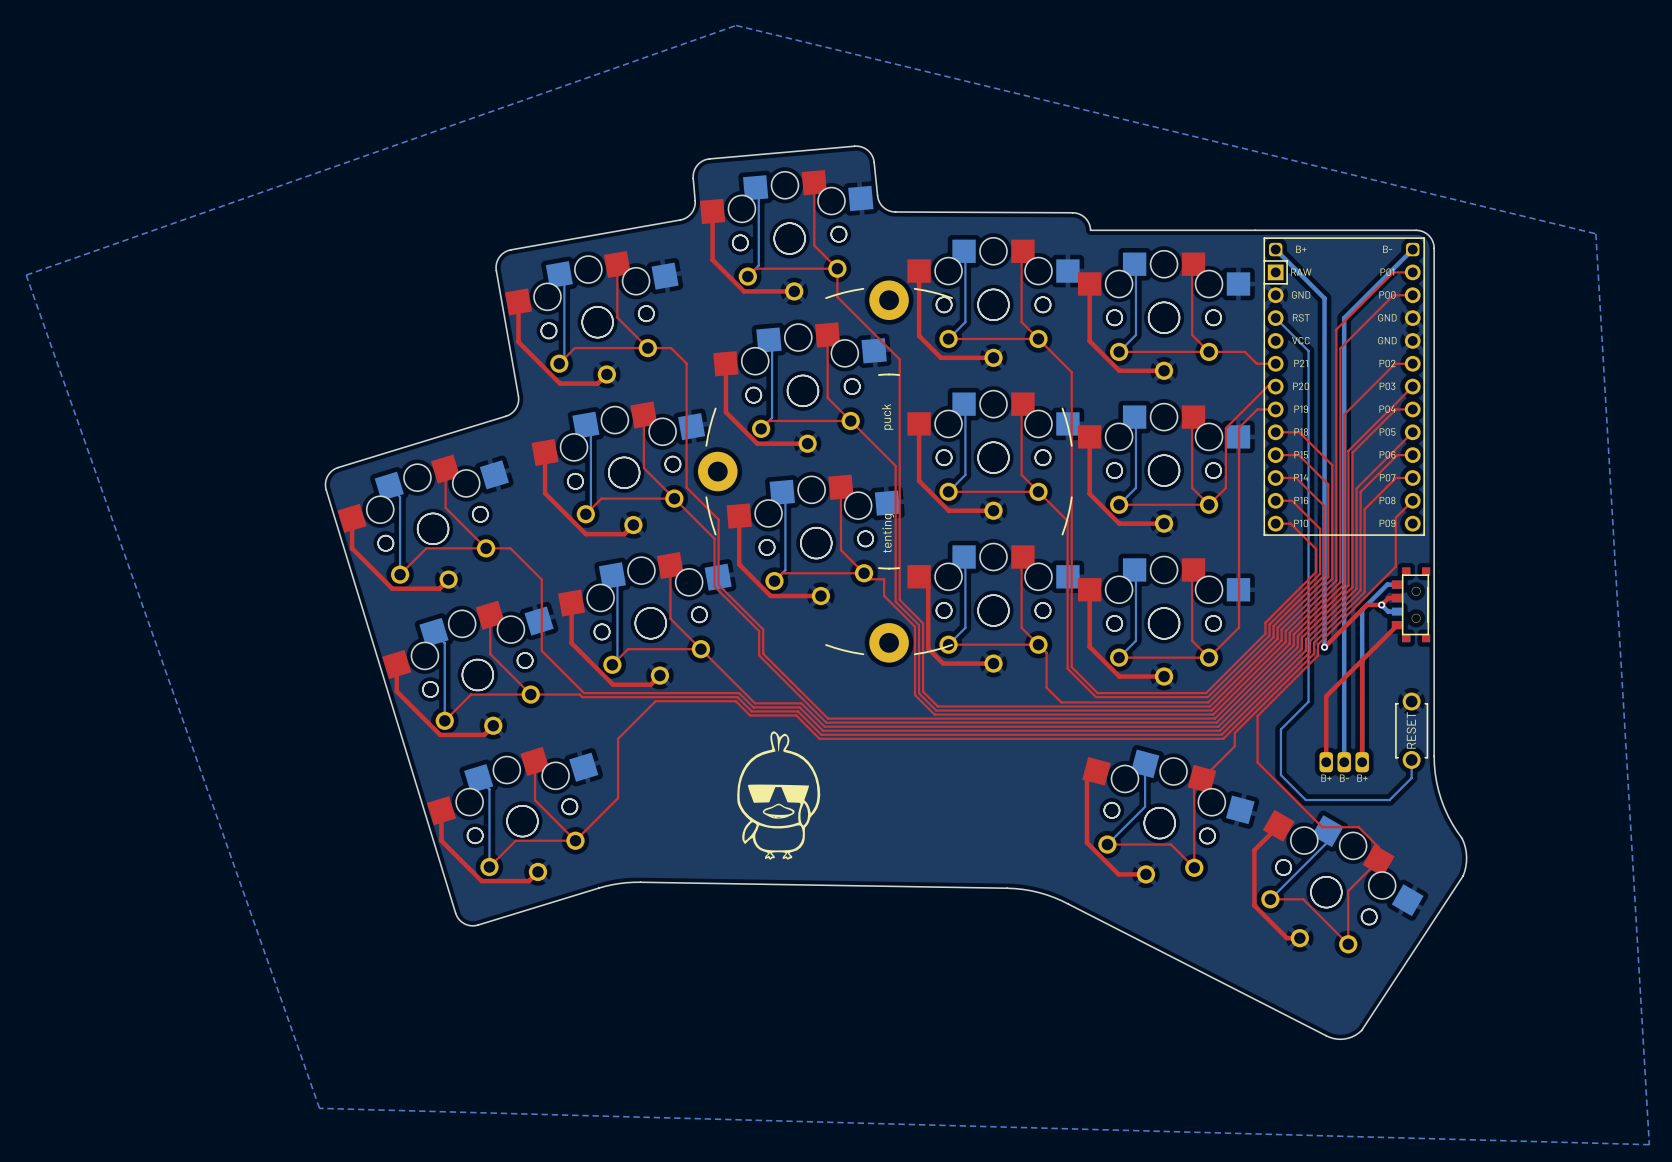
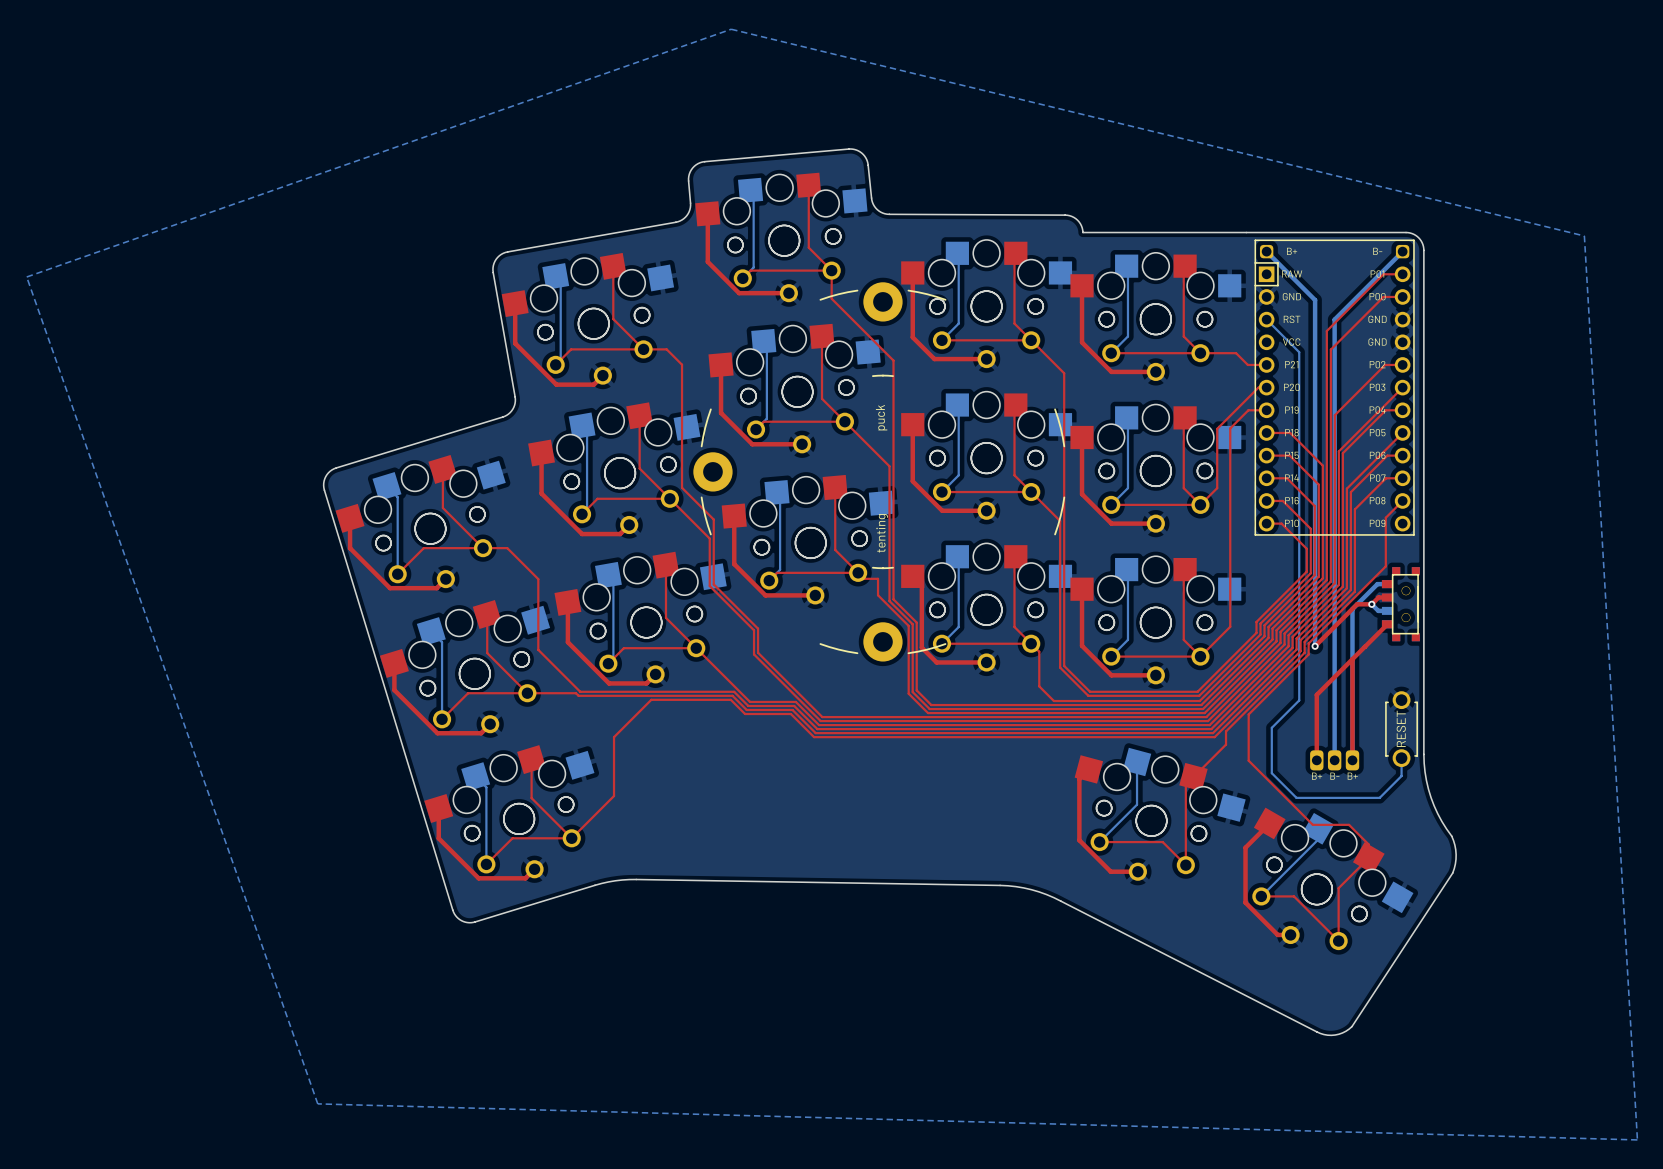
drawing: [737, 731, 821, 860] -> none

